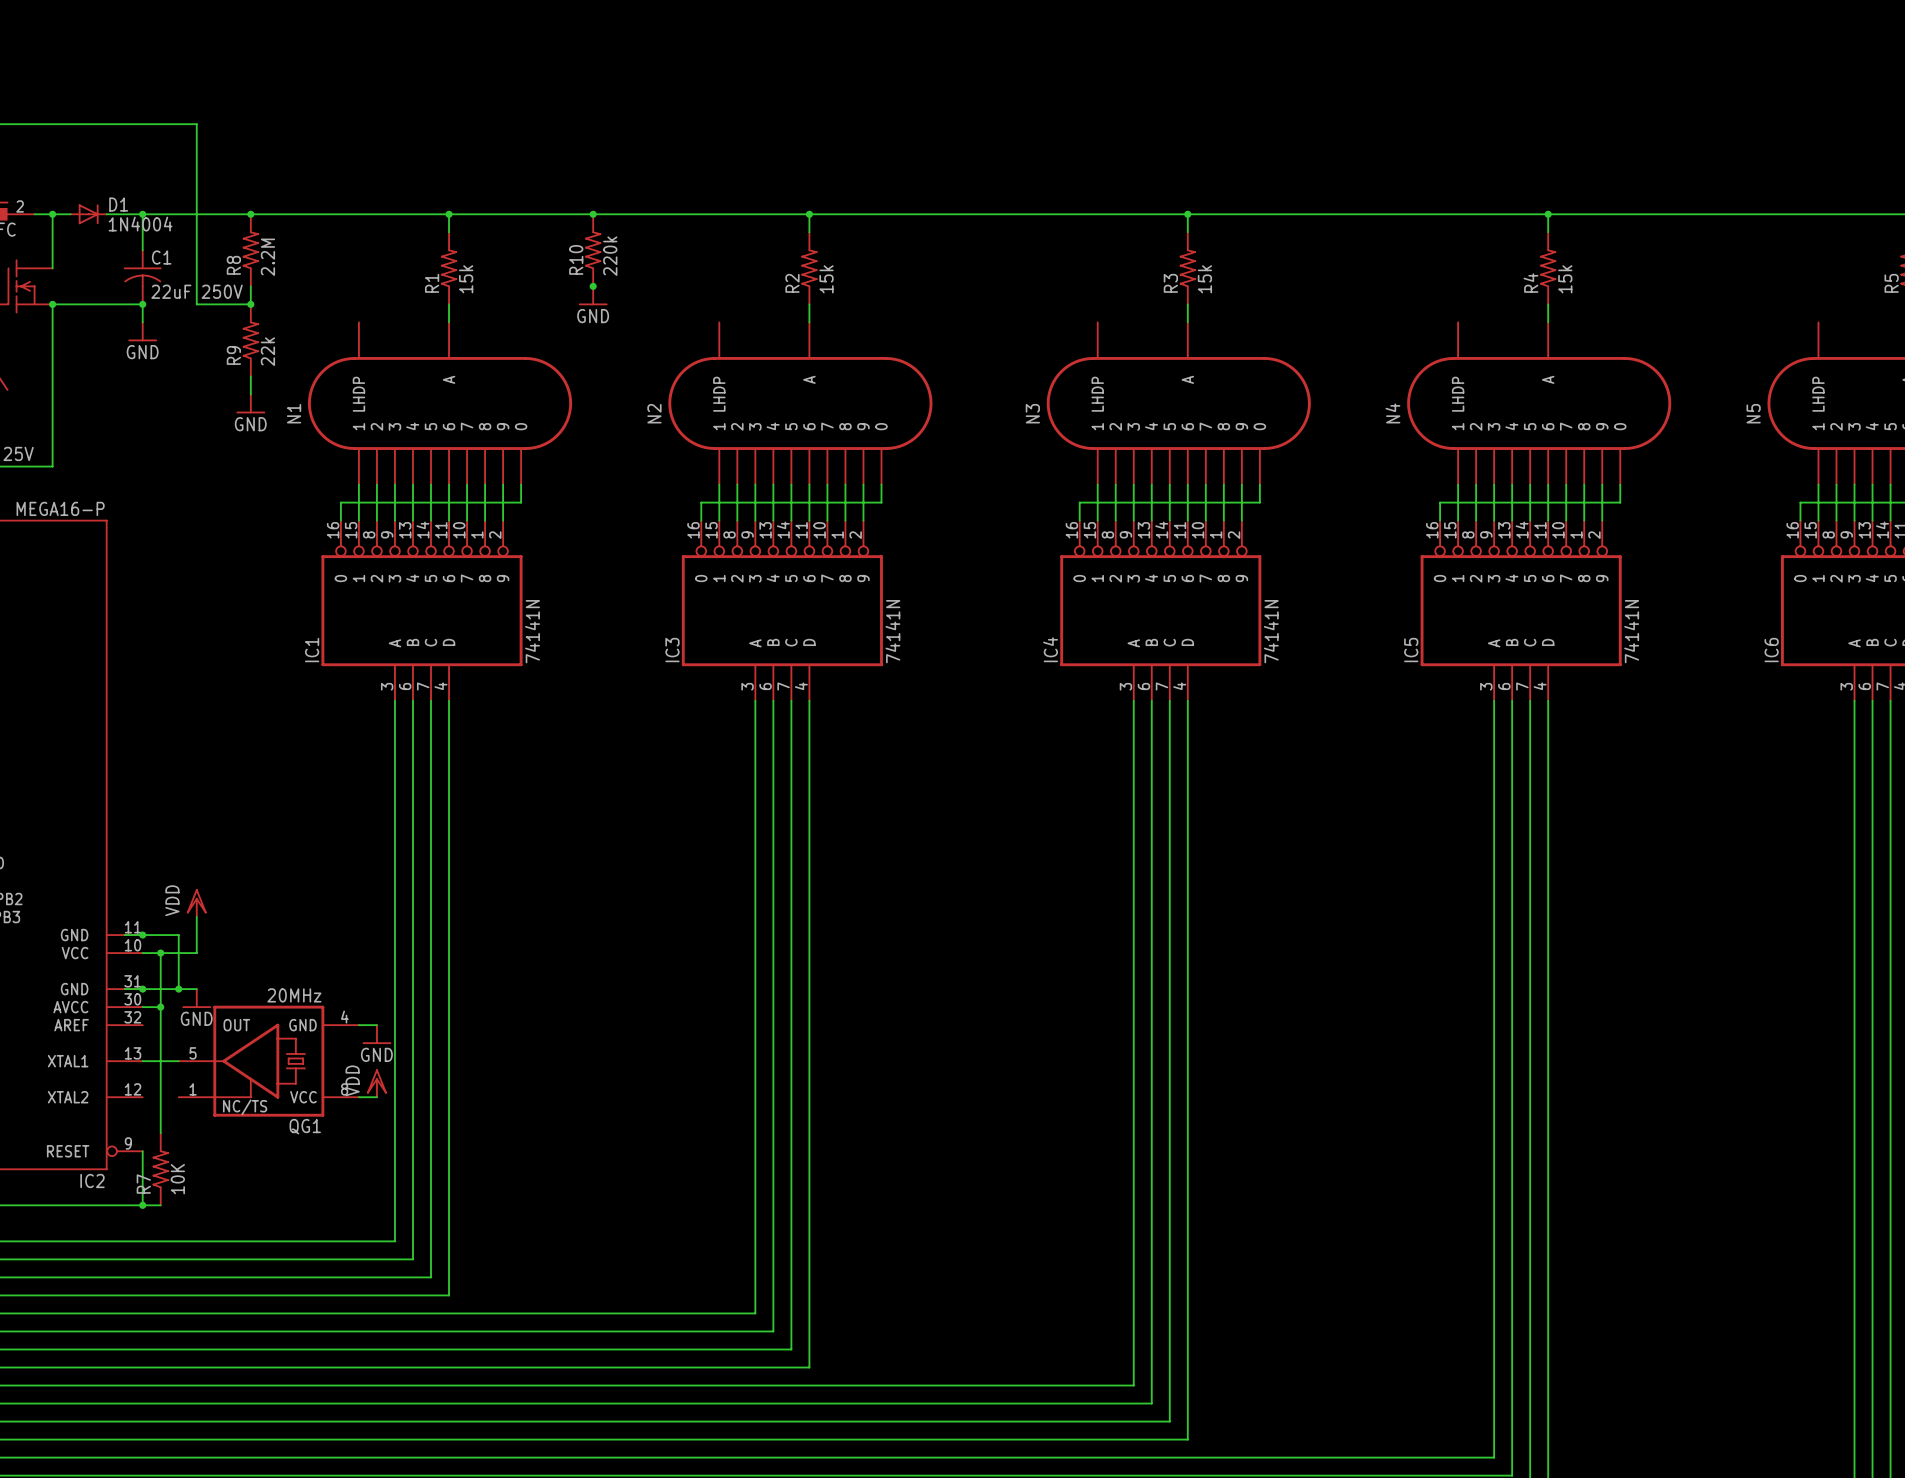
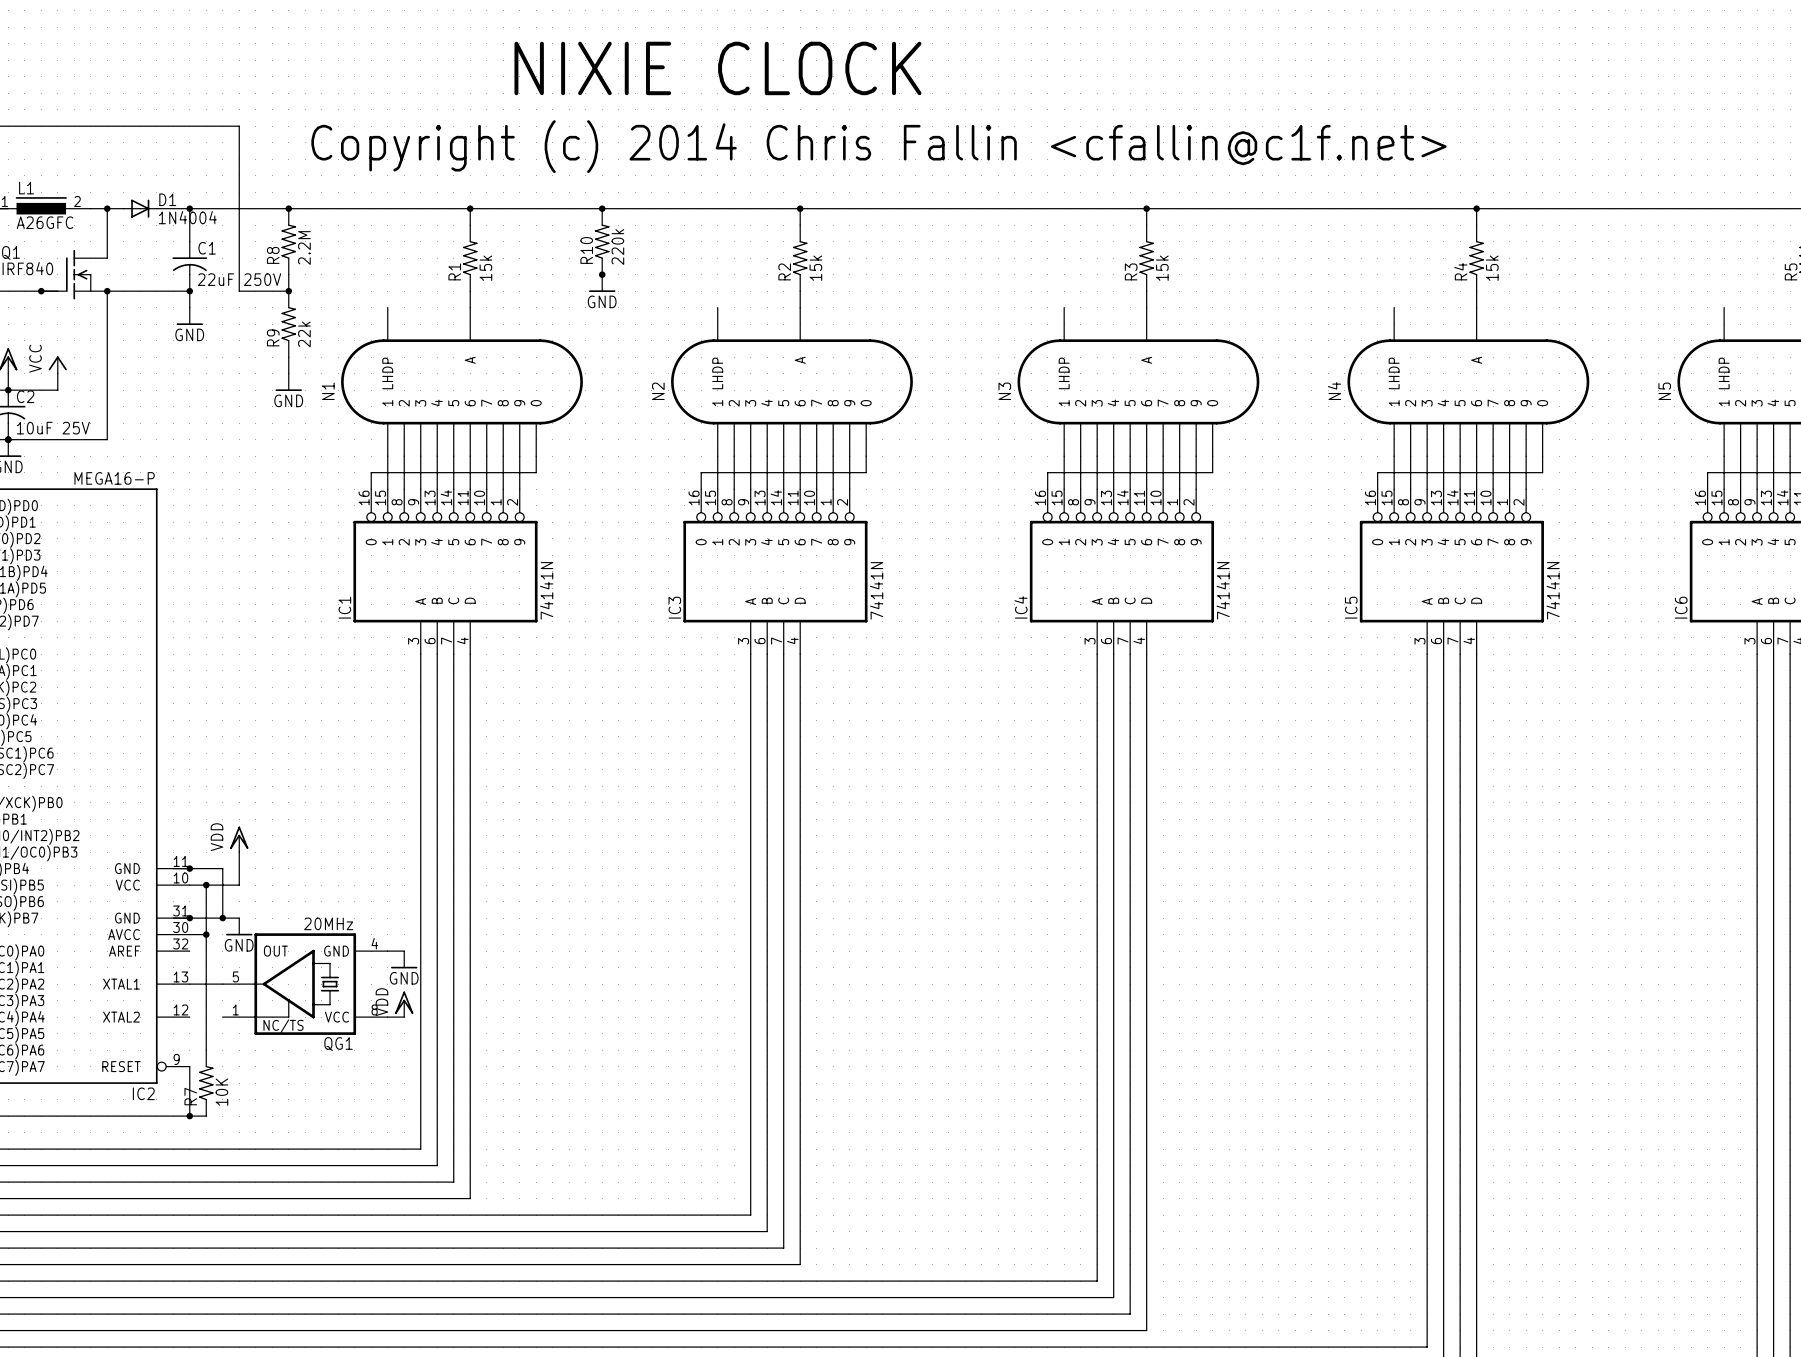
text: none -> NIXIE CLOCK (717, 68)
text: none -> Copyright (c) 2014 Chris Fallin <cfallin@c1f.net> (879, 146)

